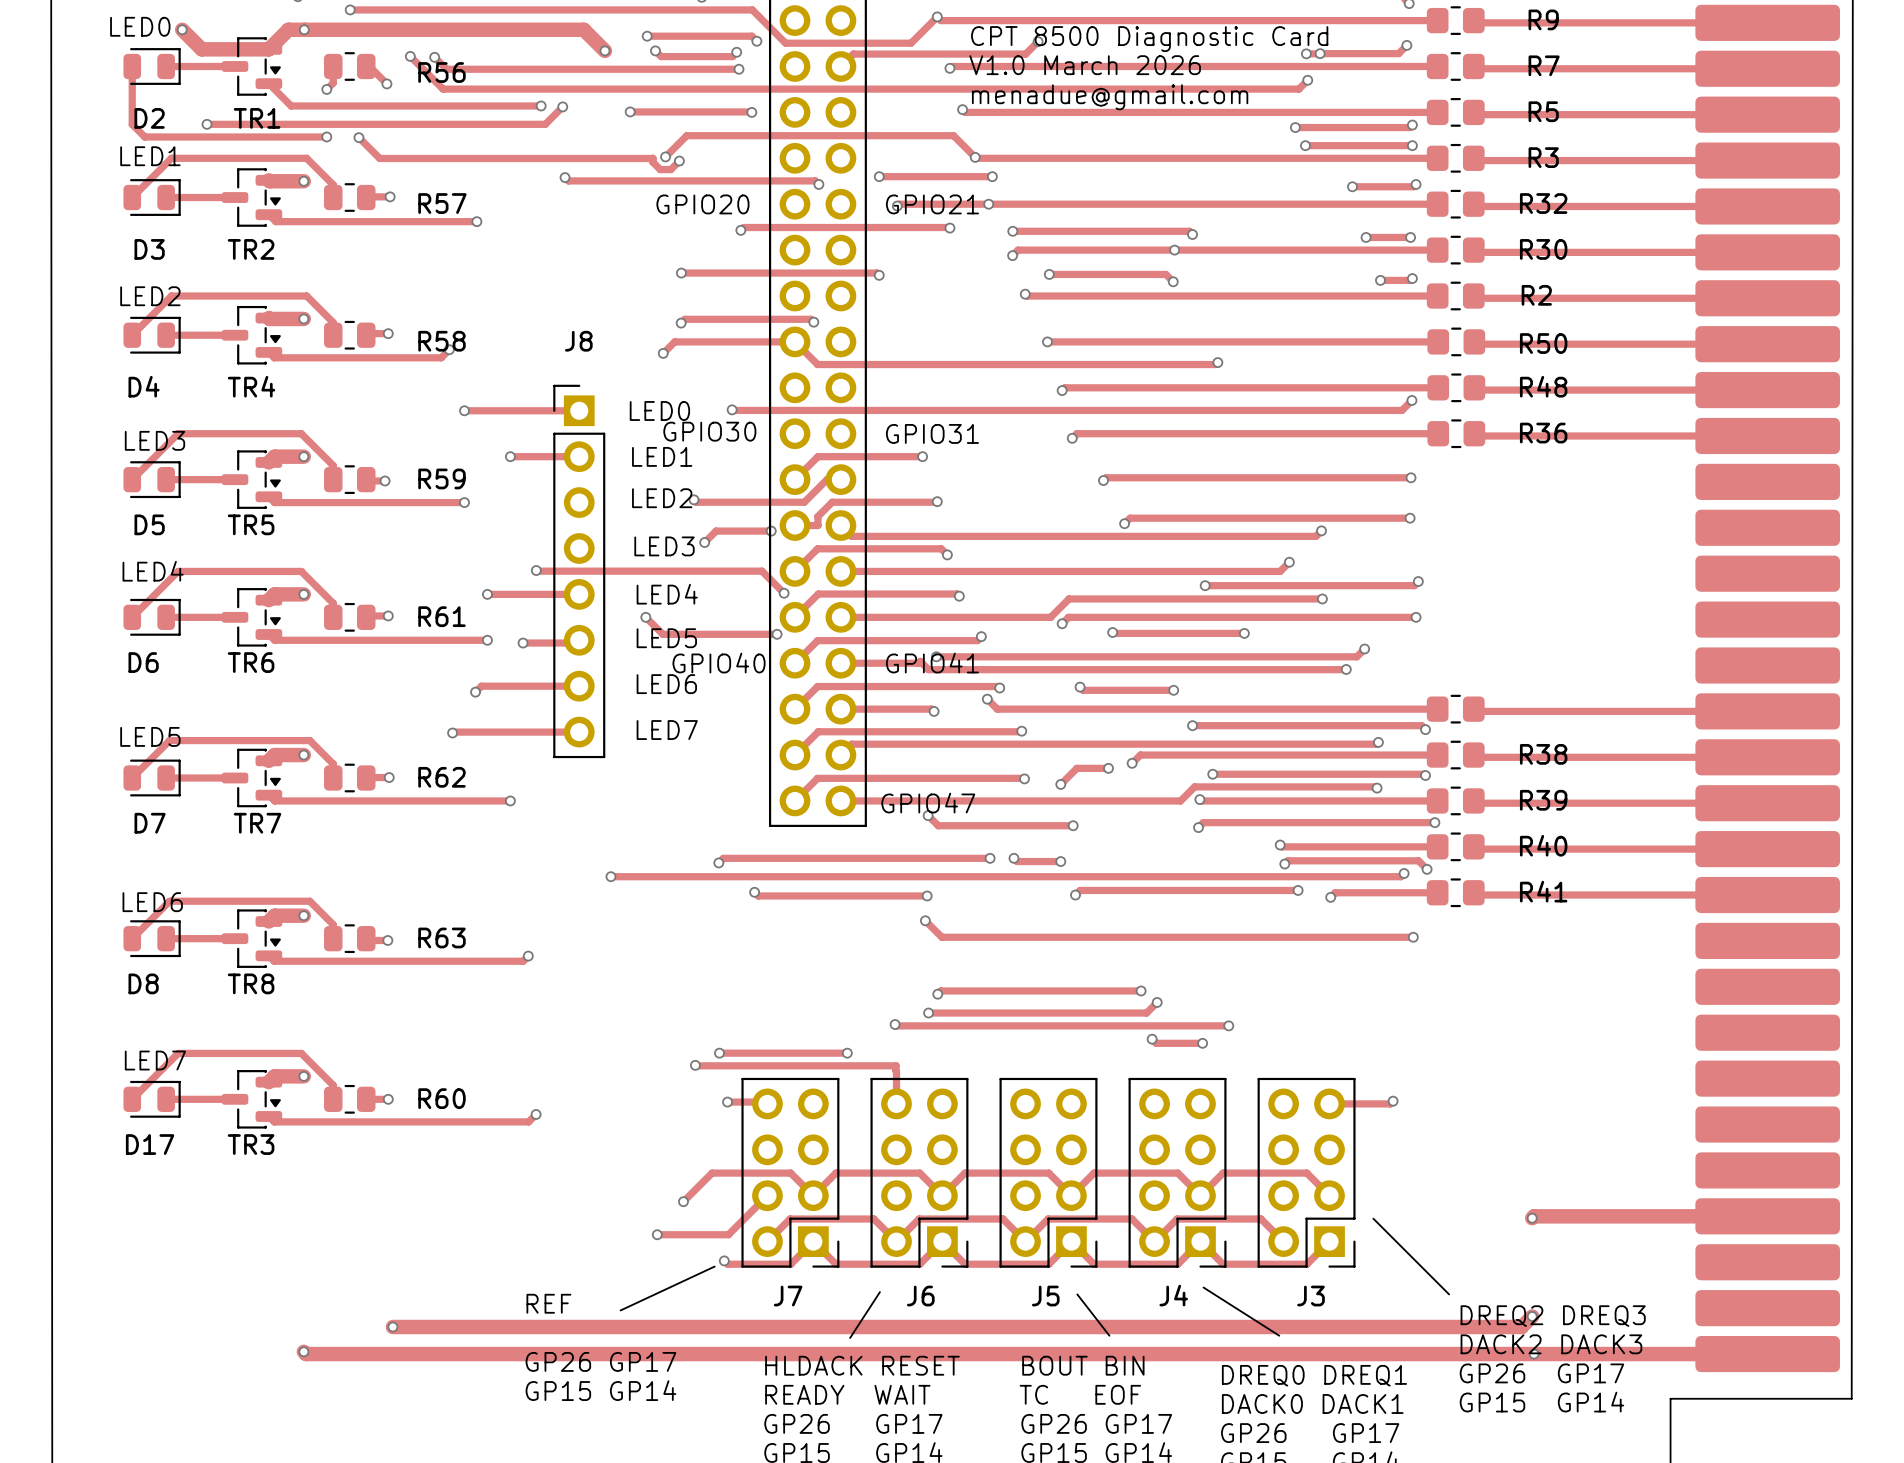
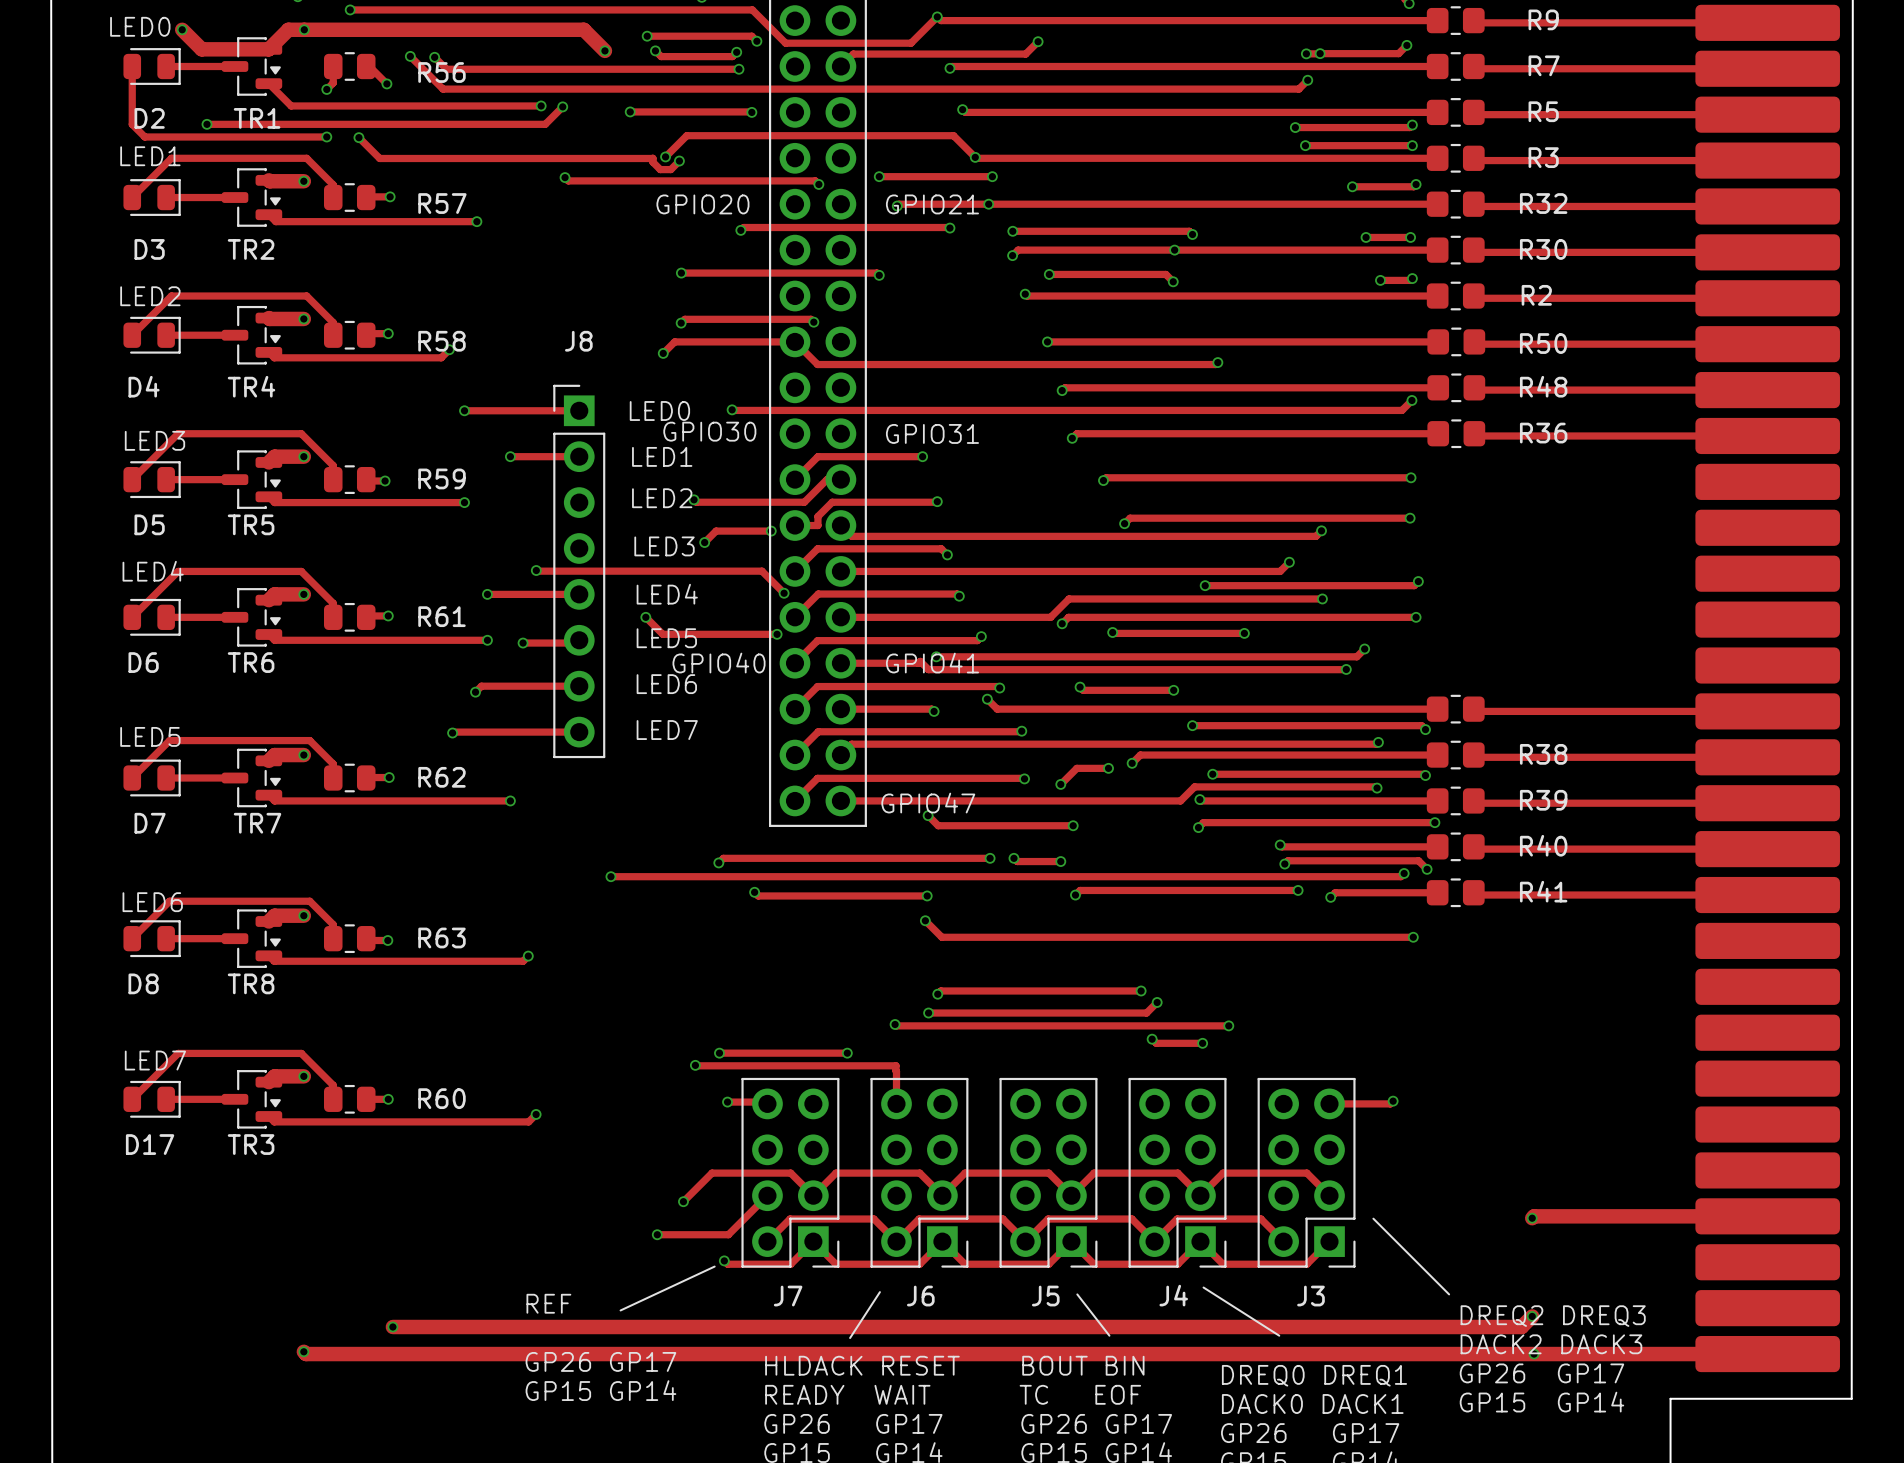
text: CPT 8500 Diagnostic Card (1149, 39) -> none
text: V1.0 March 2026 (1085, 65) -> none
text: menadue@gmail.com (1110, 97) -> none

